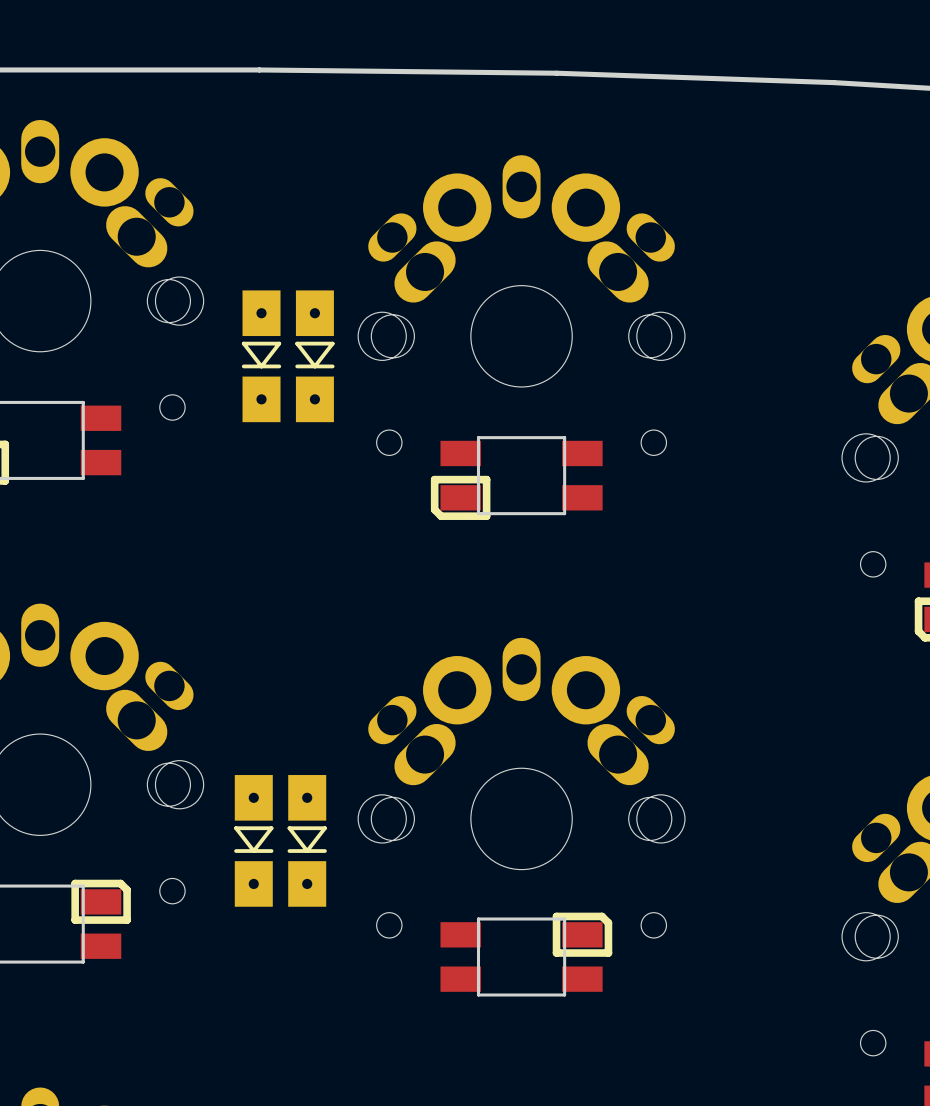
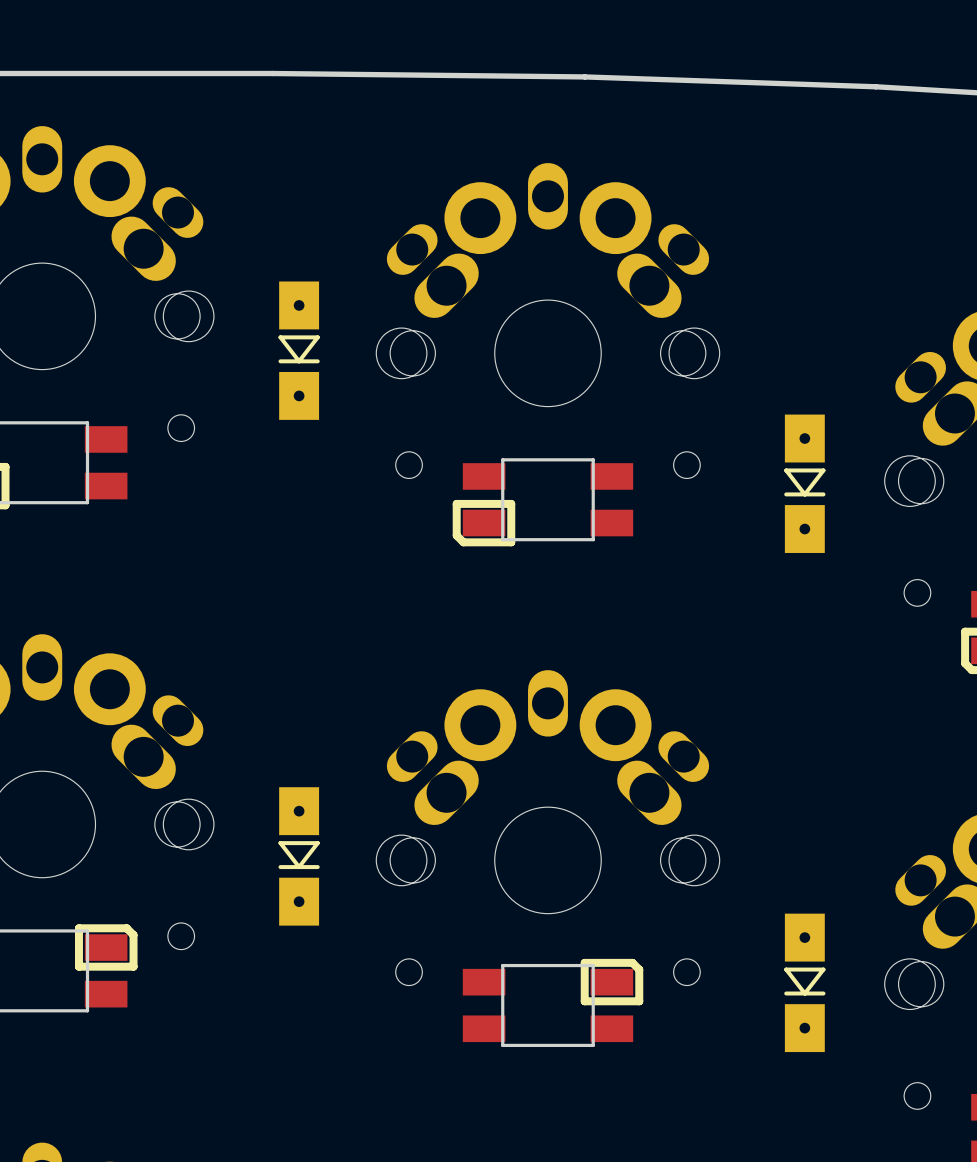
part: none -> (299, 350)
part: (261, 356) -> none
part: (314, 356) -> none
part: none -> (804, 483)
part: none -> (299, 856)
part: (253, 840) -> none
part: (307, 840) -> none
part: none -> (804, 982)

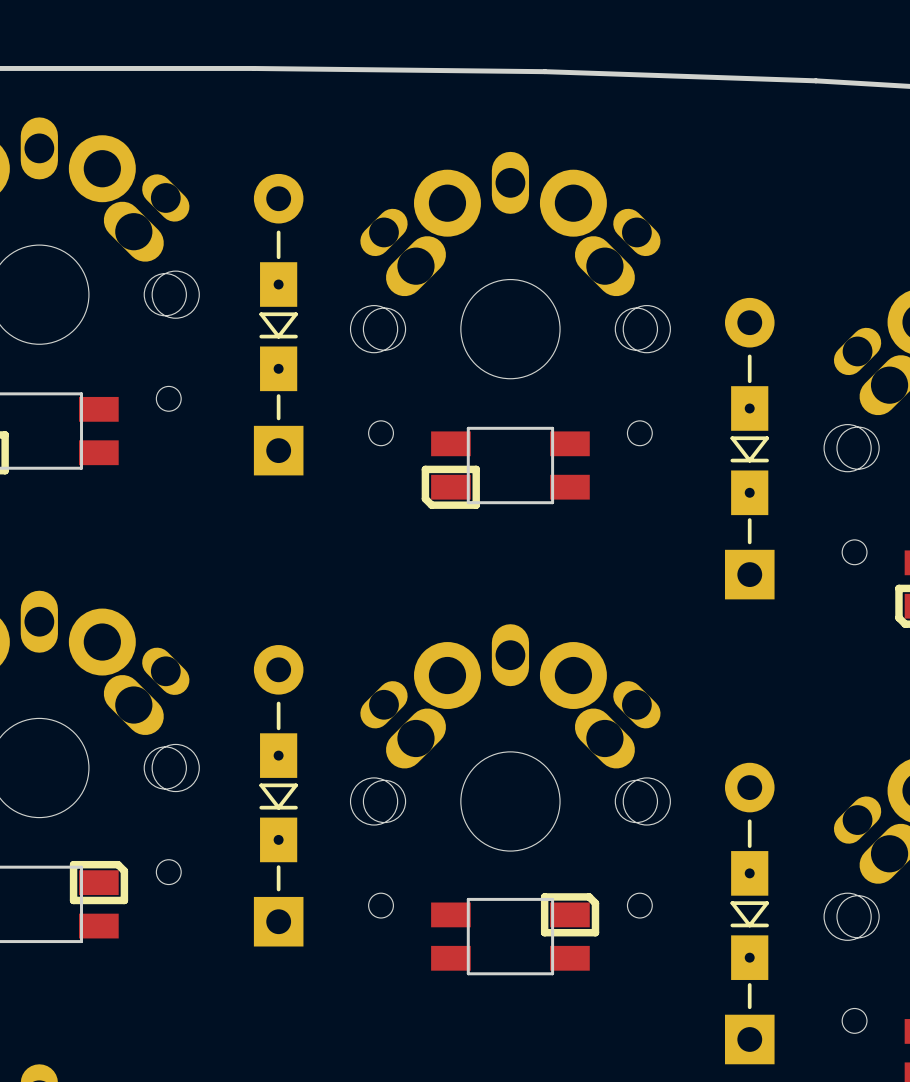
part footprint: [278, 281, 320, 420] -> [253, 173, 304, 476]
part footprint: [784, 414, 826, 553] -> [724, 297, 775, 600]
part footprint: [278, 787, 320, 926] -> [253, 645, 304, 947]
part footprint: [784, 913, 826, 1053] -> [724, 762, 775, 1065]

